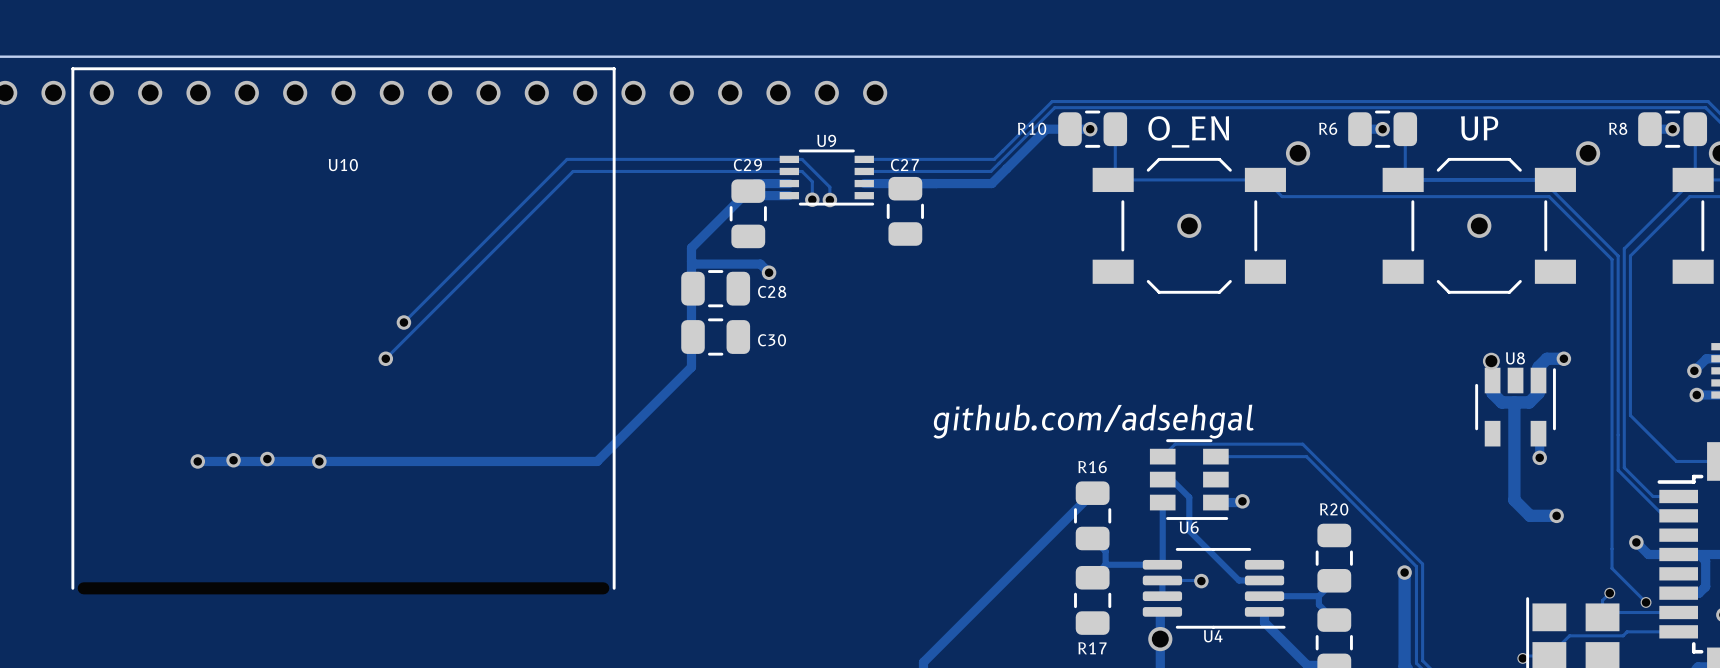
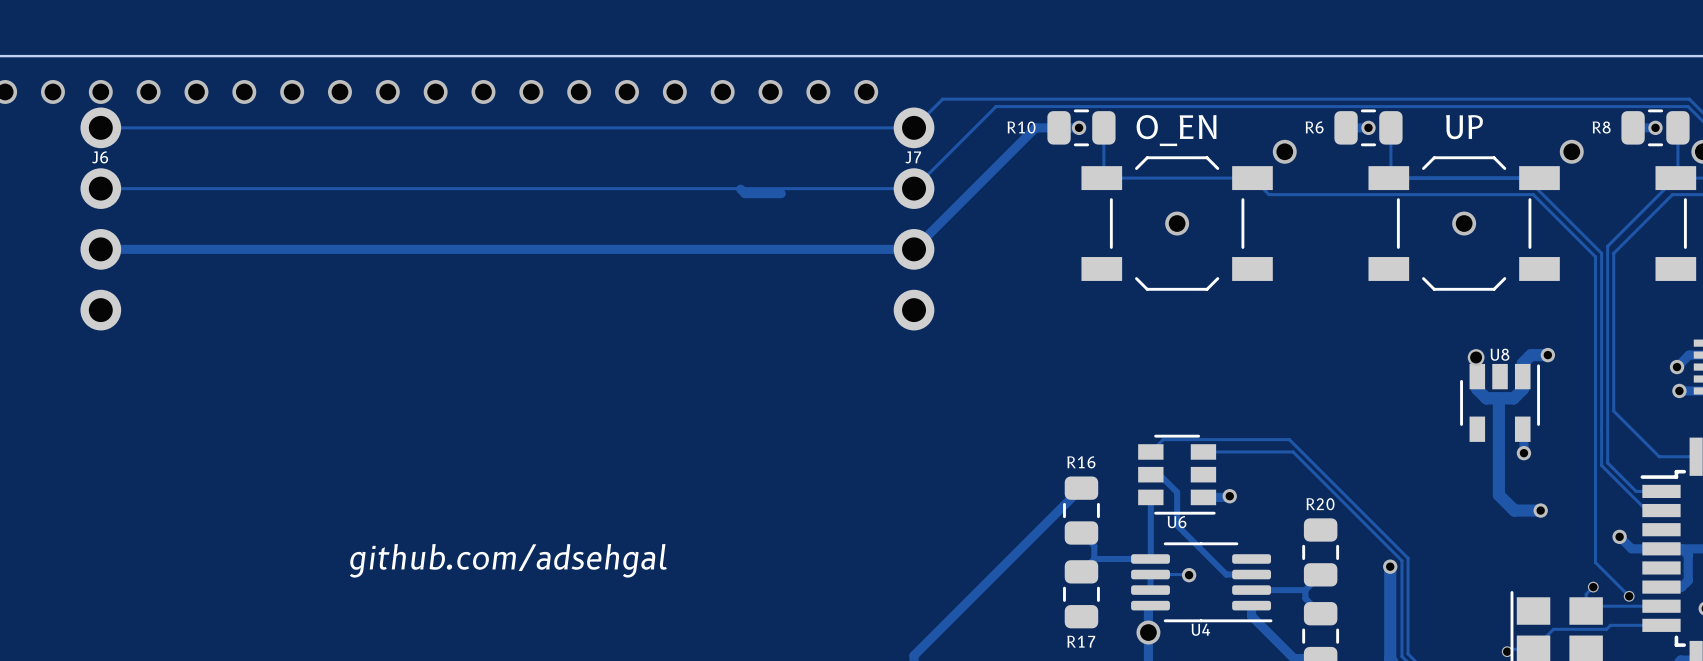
track: (1708, 101) (1052, 101) (994, 159) (864, 159) -> (1690, 100) (942, 99) (914, 127) (100, 127)
track: (1054, 107) (990, 171) (864, 171) -> (1043, 106) (996, 106) (914, 188) (100, 188)
U9: (826, 177) -> none
track: (789, 183) (755, 183) (691, 247) (691, 367) (597, 461) (197, 461) -> none
track: (864, 183) (991, 183) -> (100, 249) (914, 249) (981, 181)
track: (812, 199) (812, 181) (802, 171) (573, 171) (385, 358) -> none
via: (812, 199) -> none
track: (829, 200) (829, 187) (802, 159) (567, 159) (403, 322) -> none
via: (829, 200) -> none
C27: (905, 211) -> none
C29: (748, 213) -> none
J6: none -> (100, 218)
J7: none -> (914, 218)
track: (691, 261) (694, 264) (760, 264) (769, 272) -> none
via: (769, 272) -> none
C28: (715, 288) -> none
via: (403, 322) -> none
U10: (343, 330) -> none
C30: (715, 337) -> none
via: (385, 358) -> none
text position: github.com/adsehgal (1093, 421) -> github.com/adsehgal (508, 560)
via: (267, 459) -> none
via: (233, 460) -> none
via: (197, 461) -> none
via: (319, 461) -> none

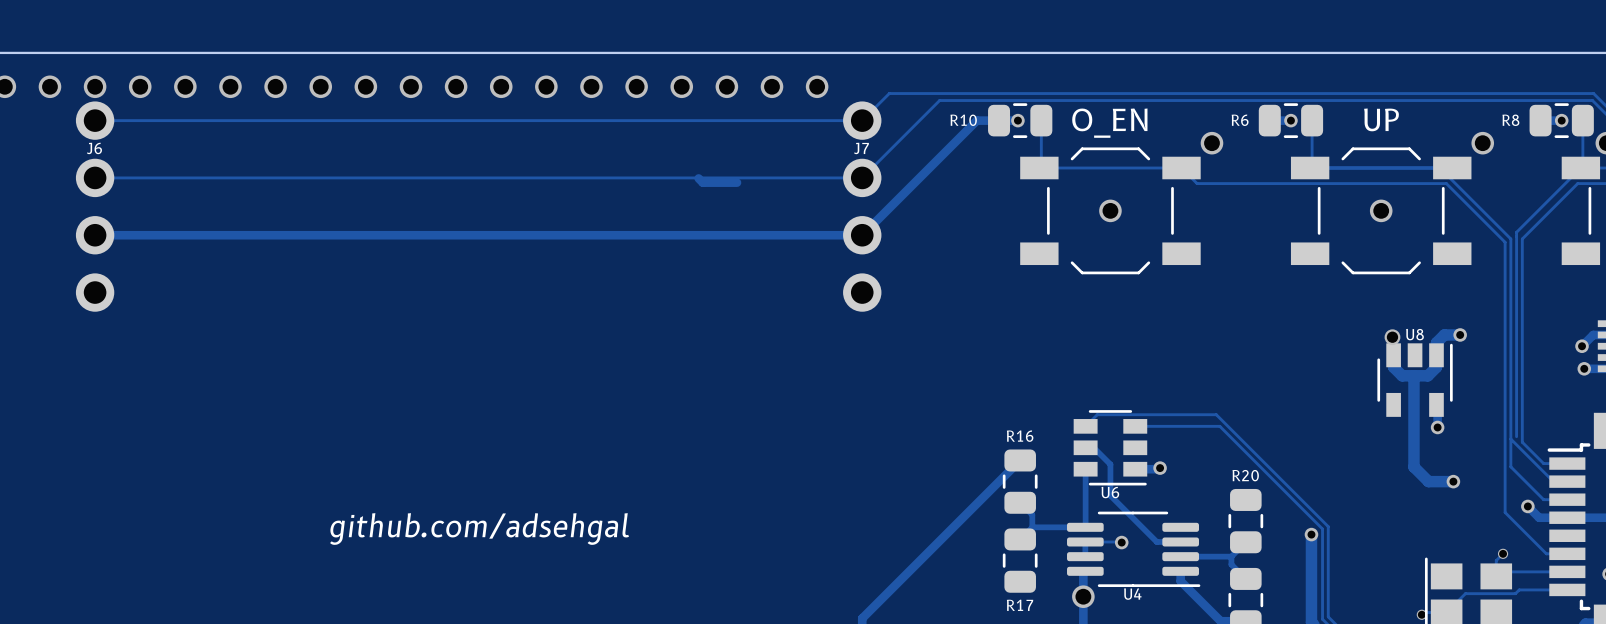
track: (1613, 411) (1659, 456) (1696, 456) -> none
track: (1607, 462) (1636, 491) -> (1522, 387) (1522, 442) (1543, 463)
track: none -> (1510, 439) (1510, 466) (1543, 499) (1567, 499)
track: (1595, 543) (1595, 562) (1629, 596) -> (1505, 512) (1546, 553) (1567, 553)
track: (1681, 548) (1688, 555) (1688, 580) (1681, 587) (1661, 587) -> none
via: (1629, 596) -> none

